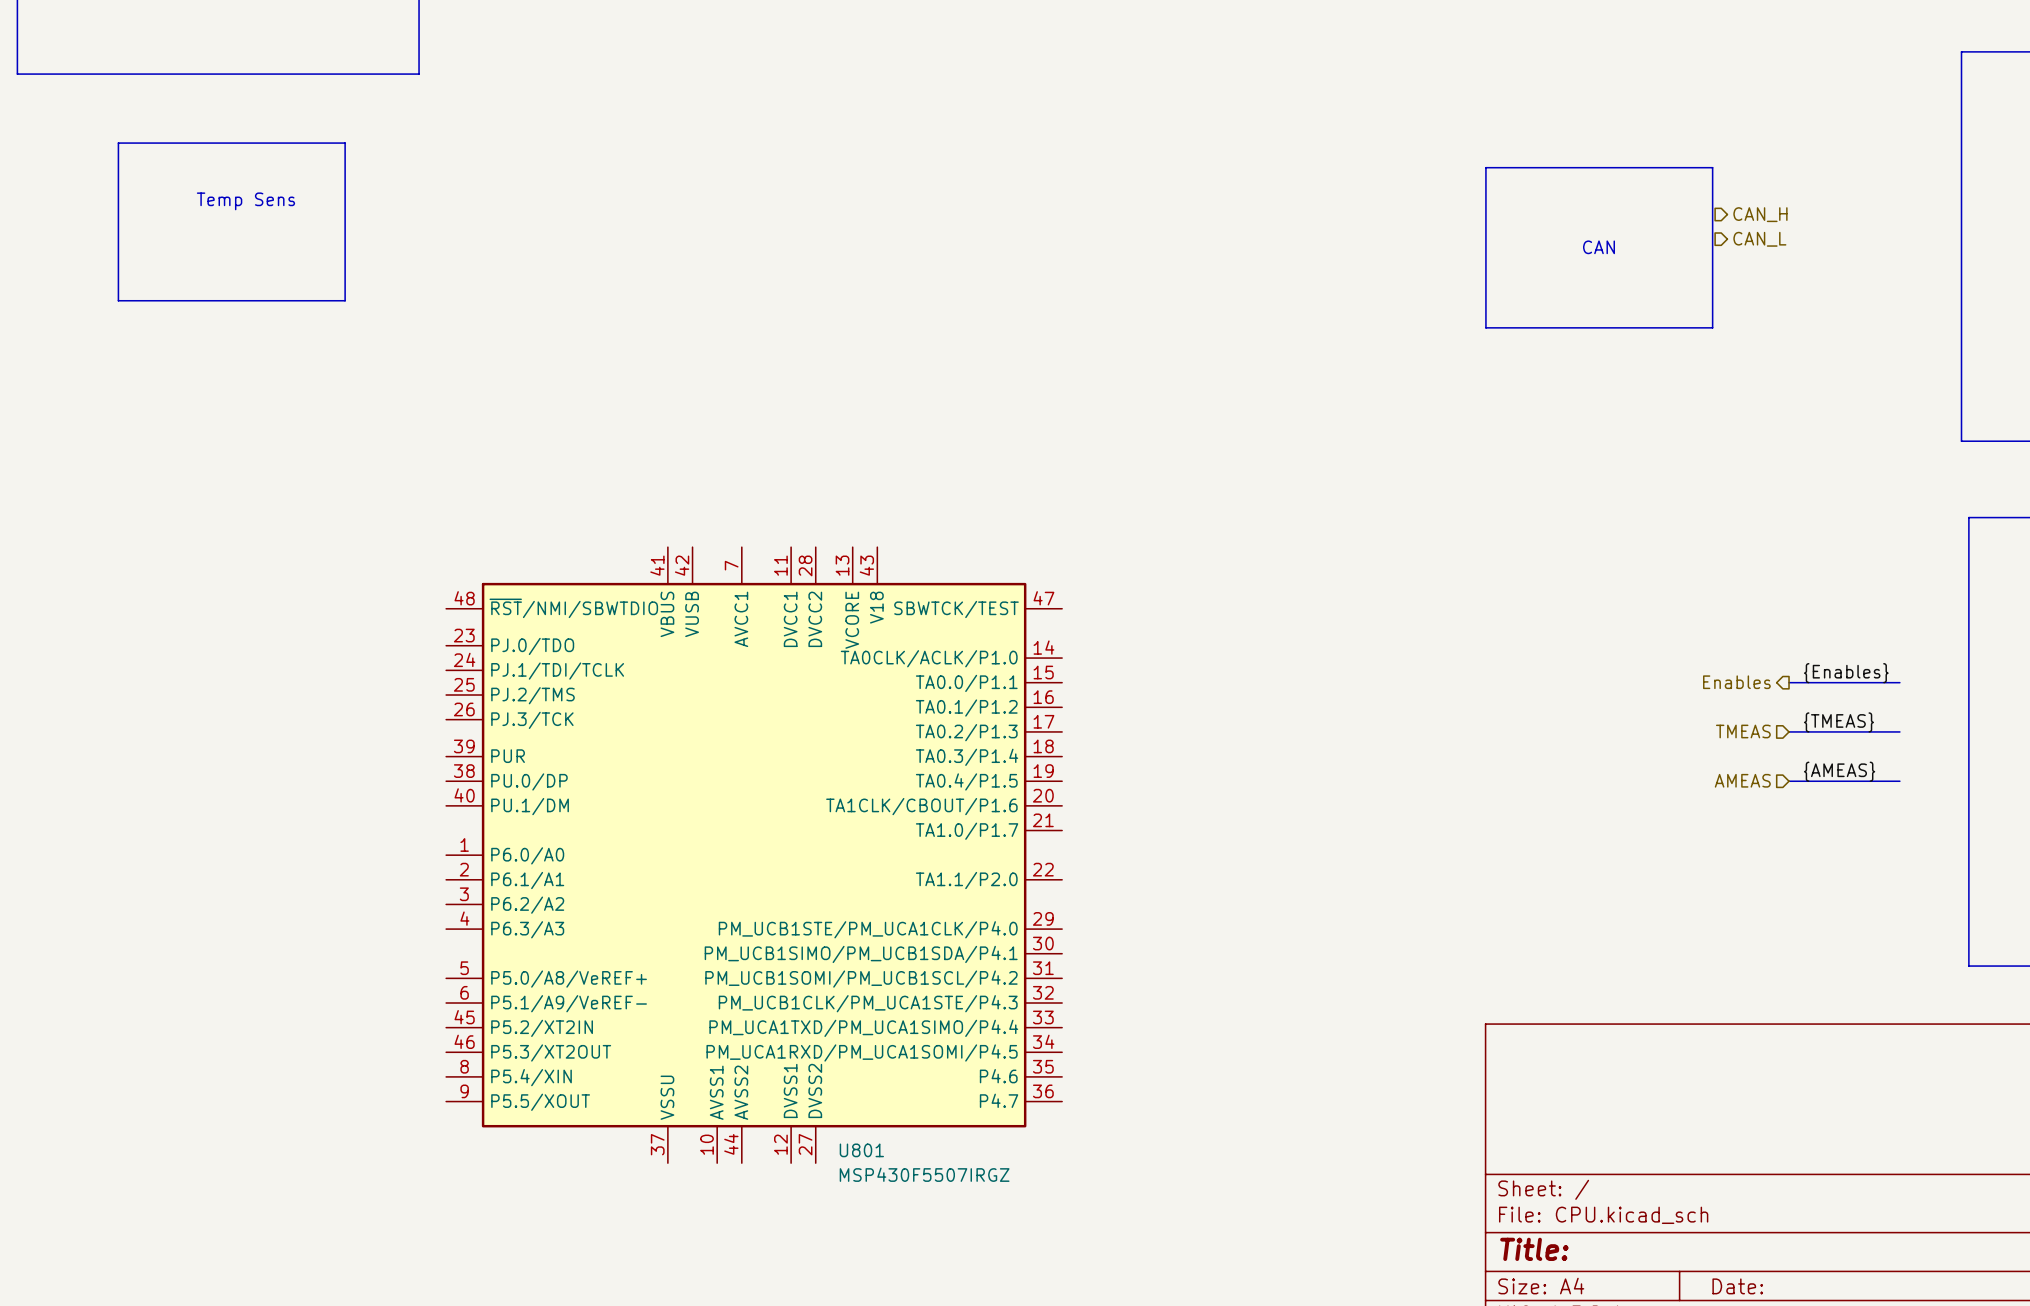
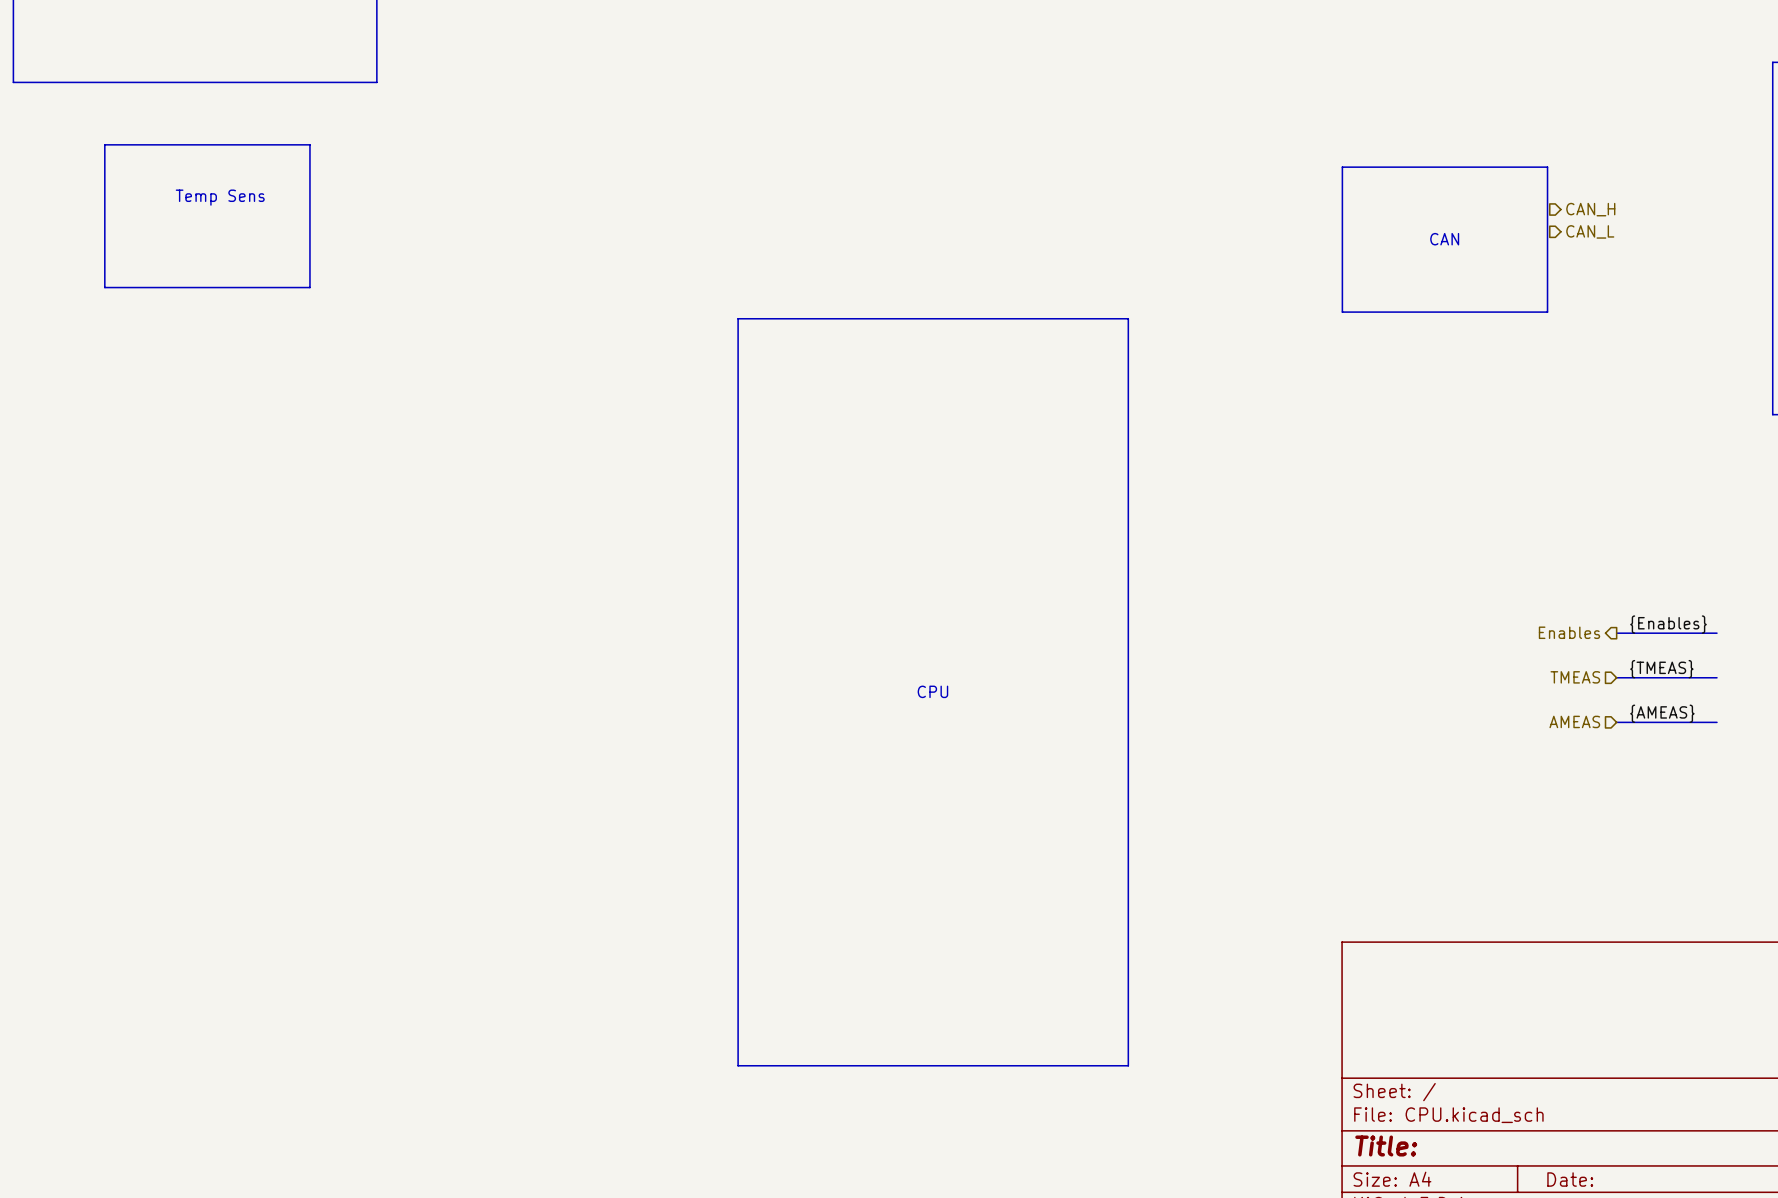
line: none -> (738, 318) (1128, 318) (1128, 1065) (738, 1065) (738, 318)
text: none -> CPU (932, 691)
U801: MSP430F5507IRGZ (754, 855) -> none

